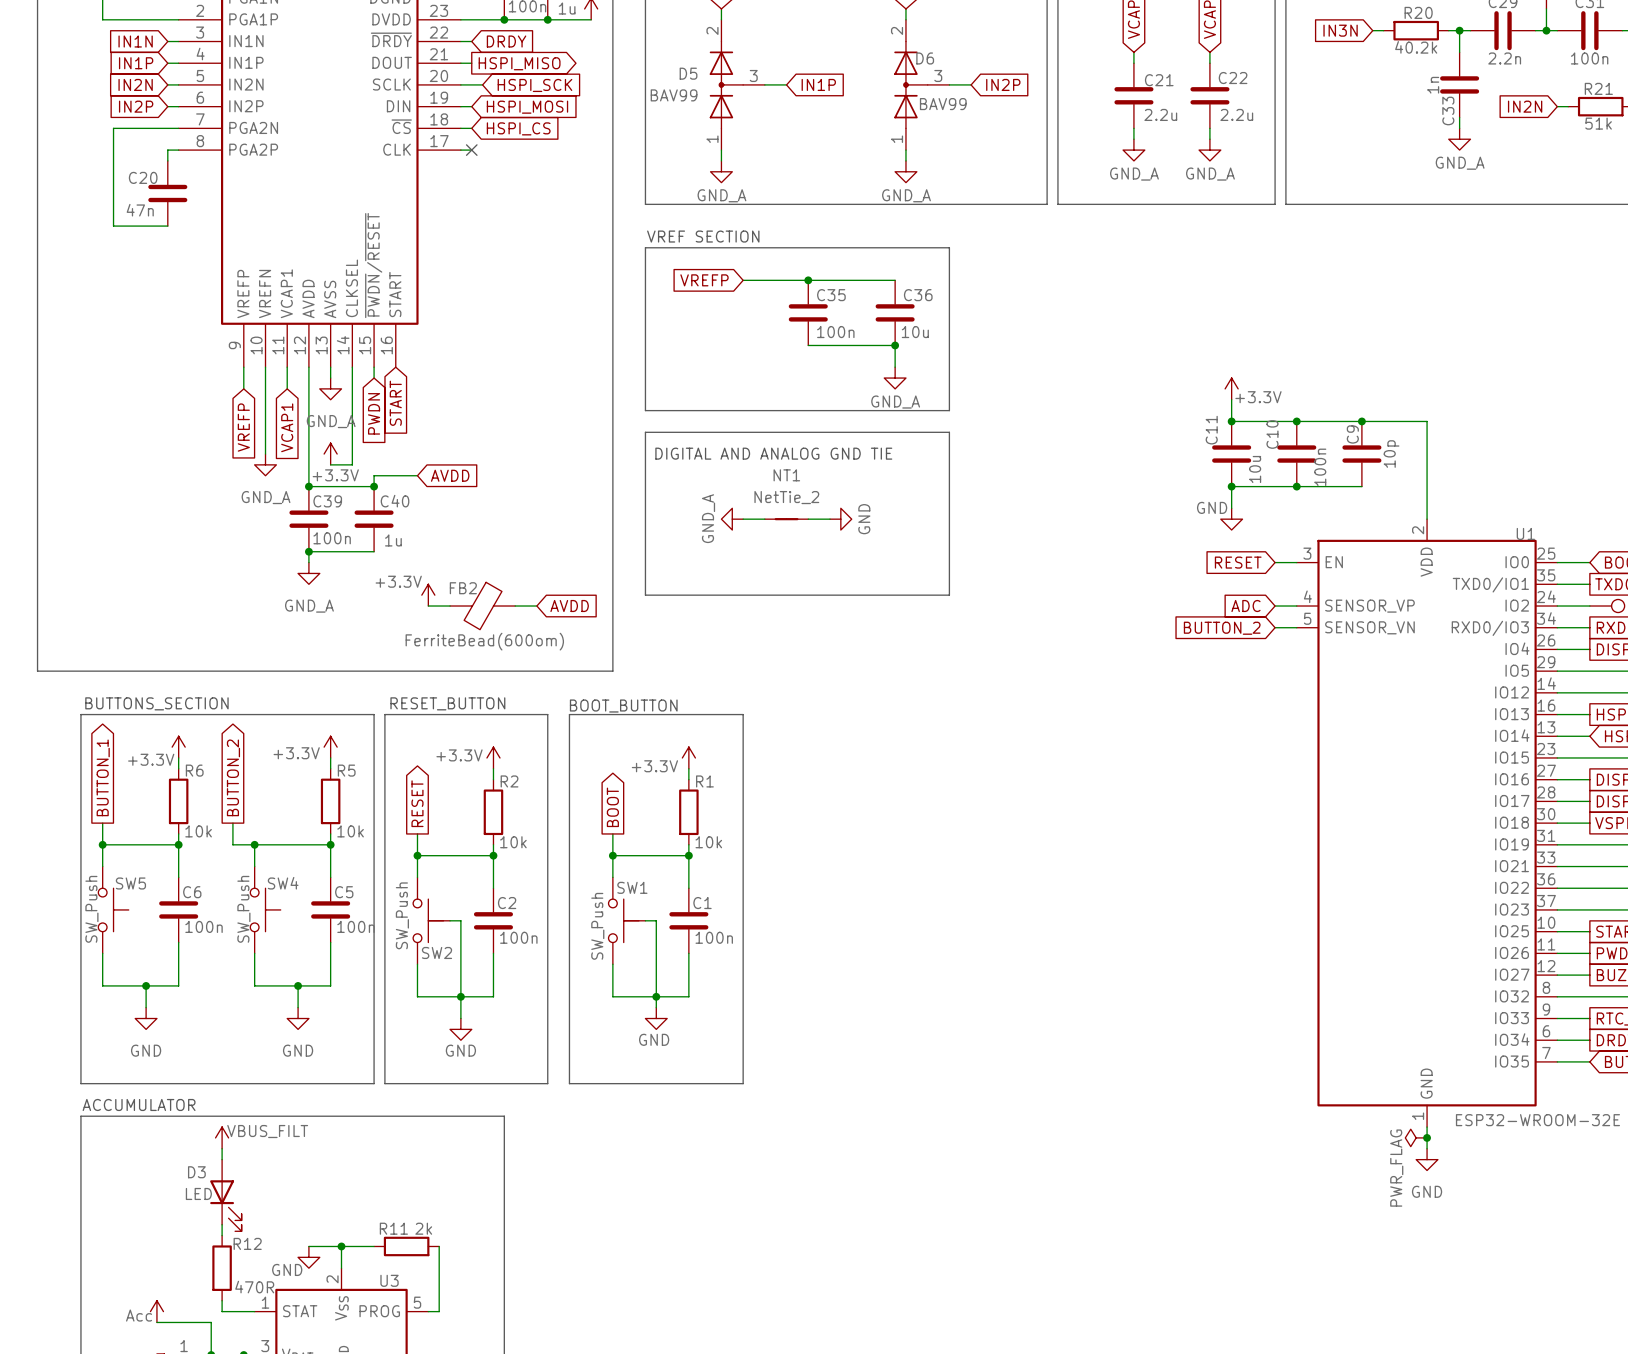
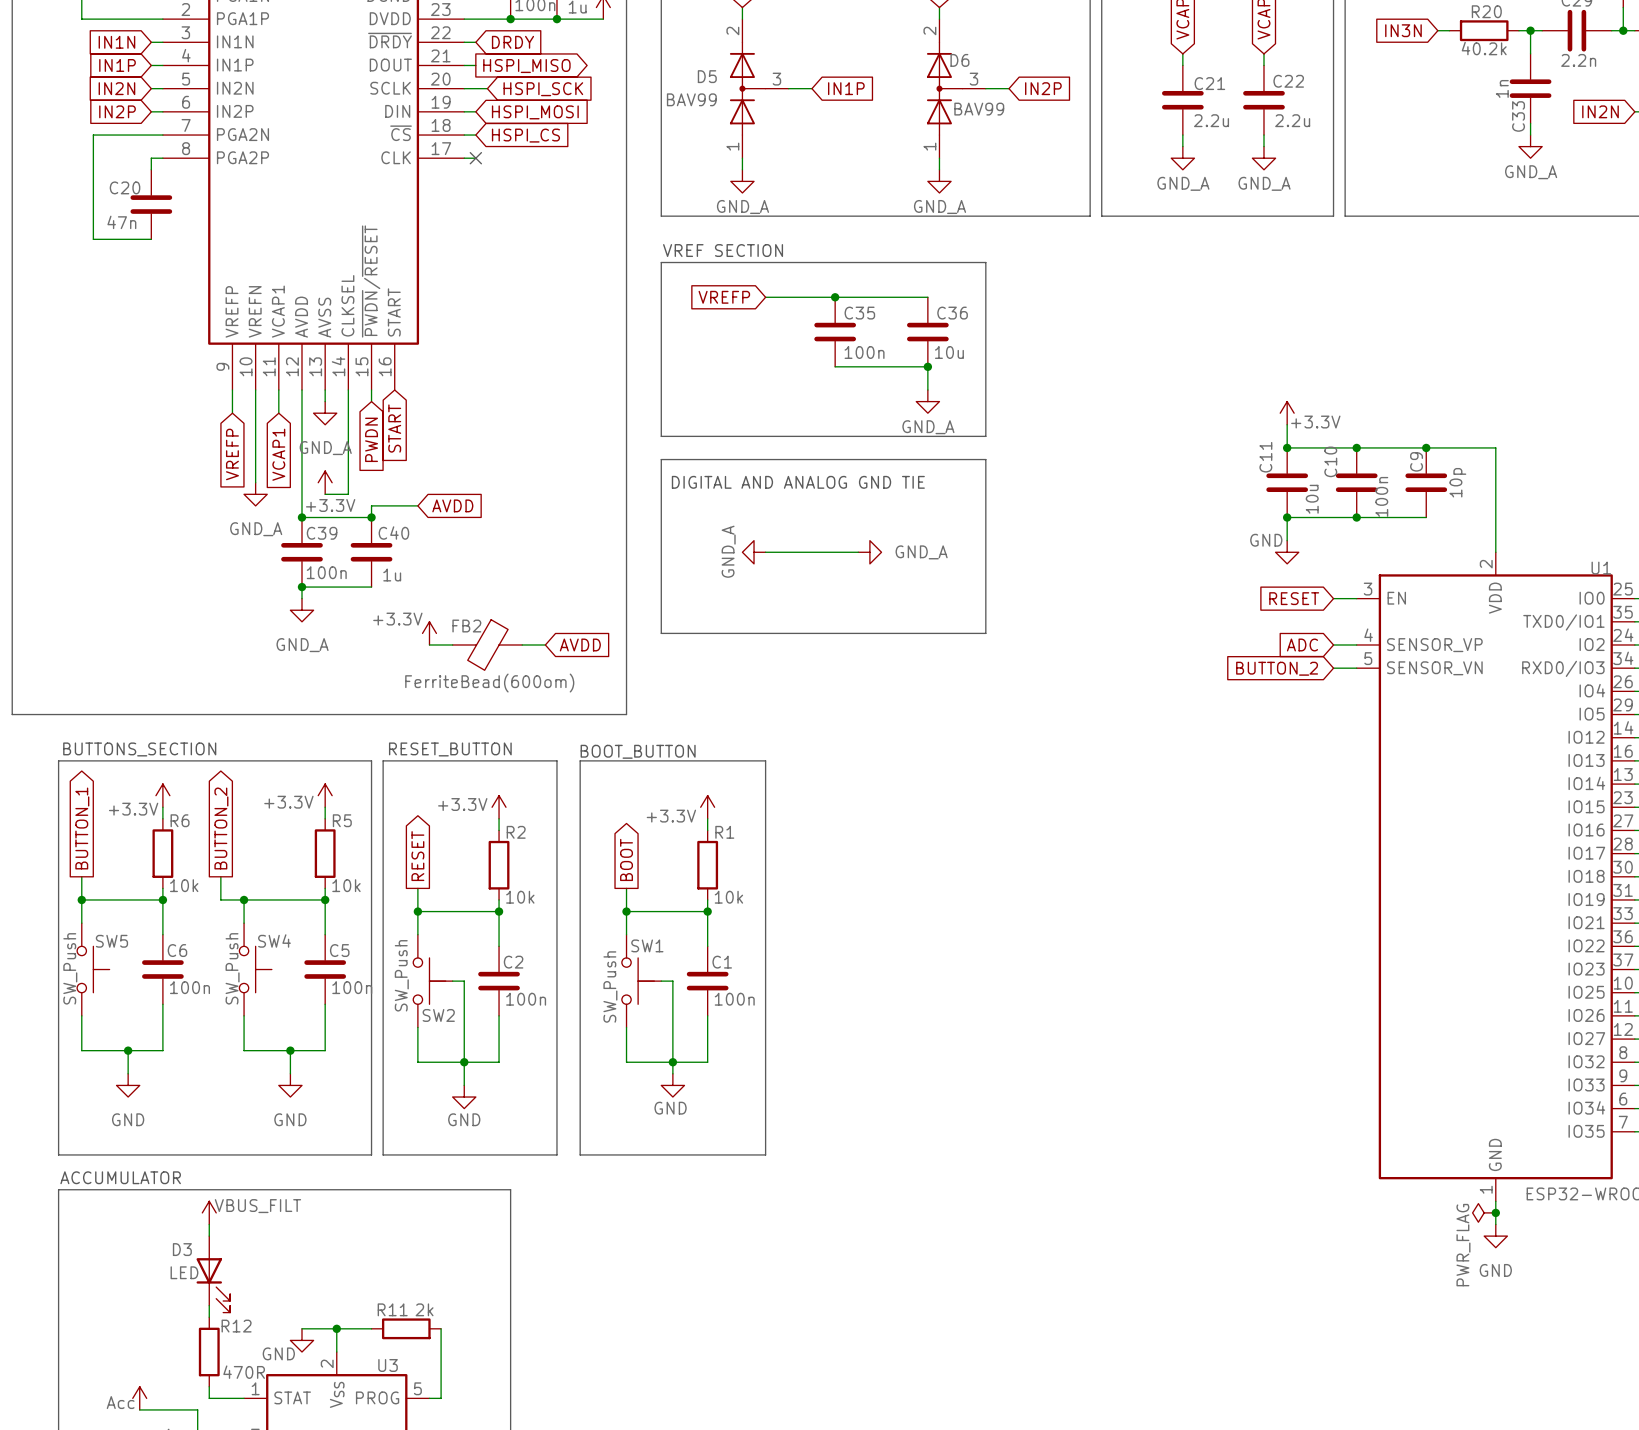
NT1: NetTie_2 (786, 519) -> none
power symbol: GND (840, 519) -> GND_A (869, 552)

